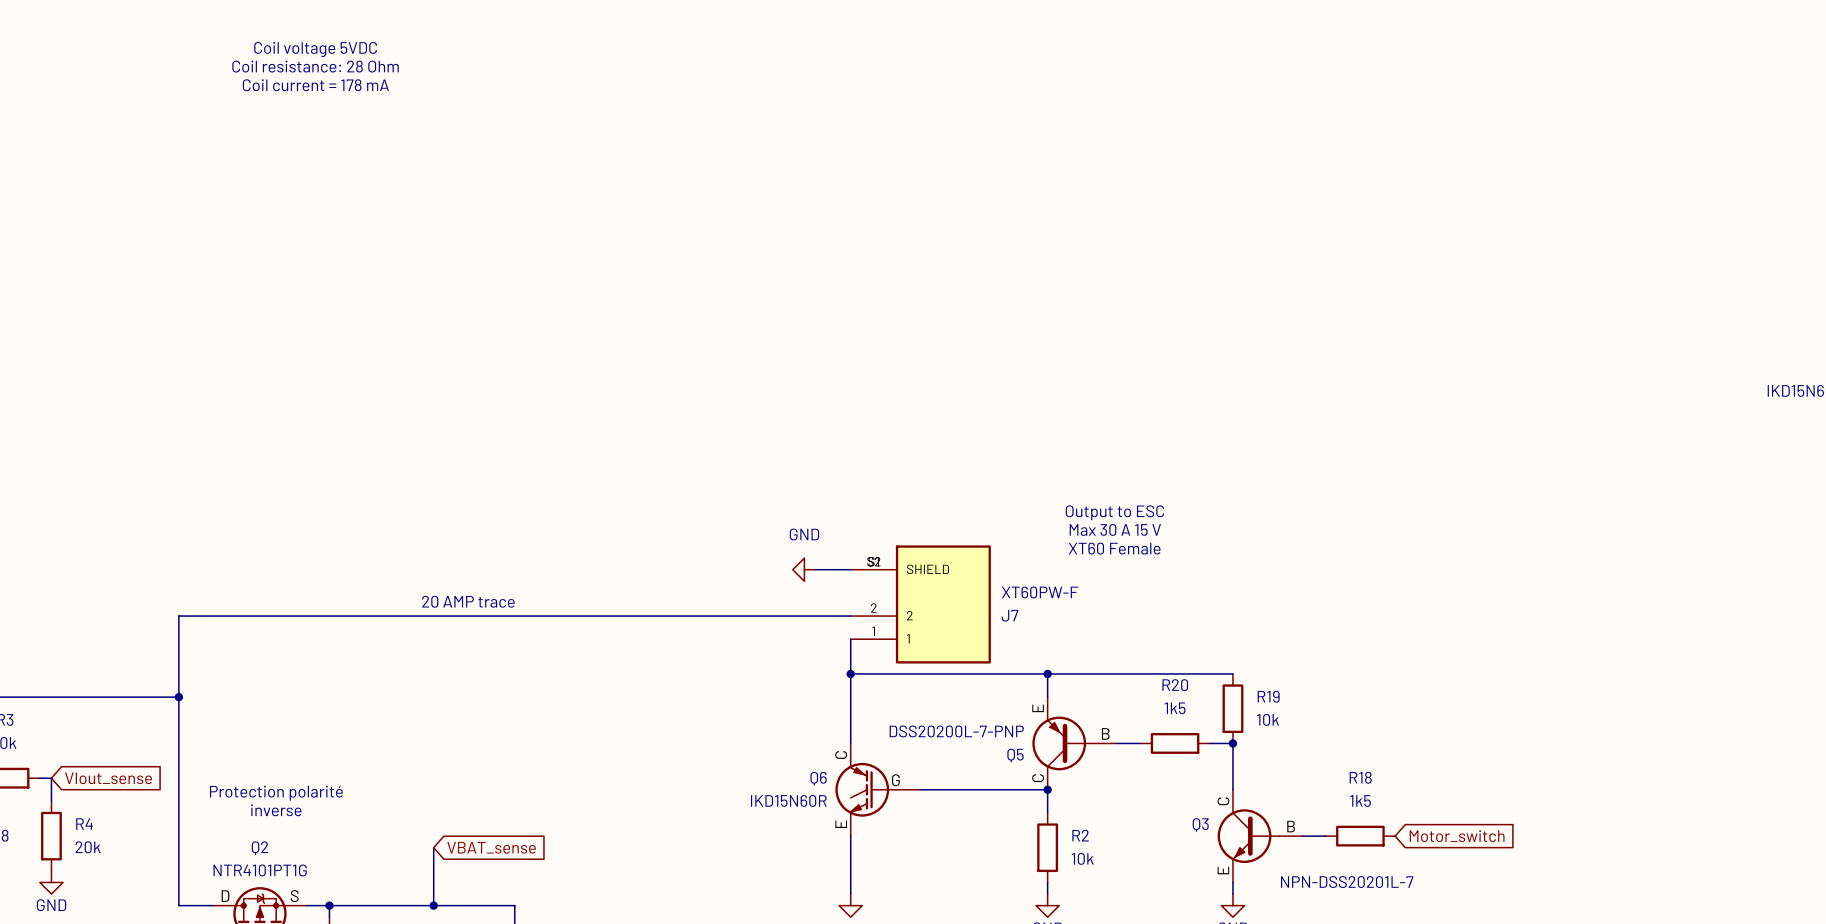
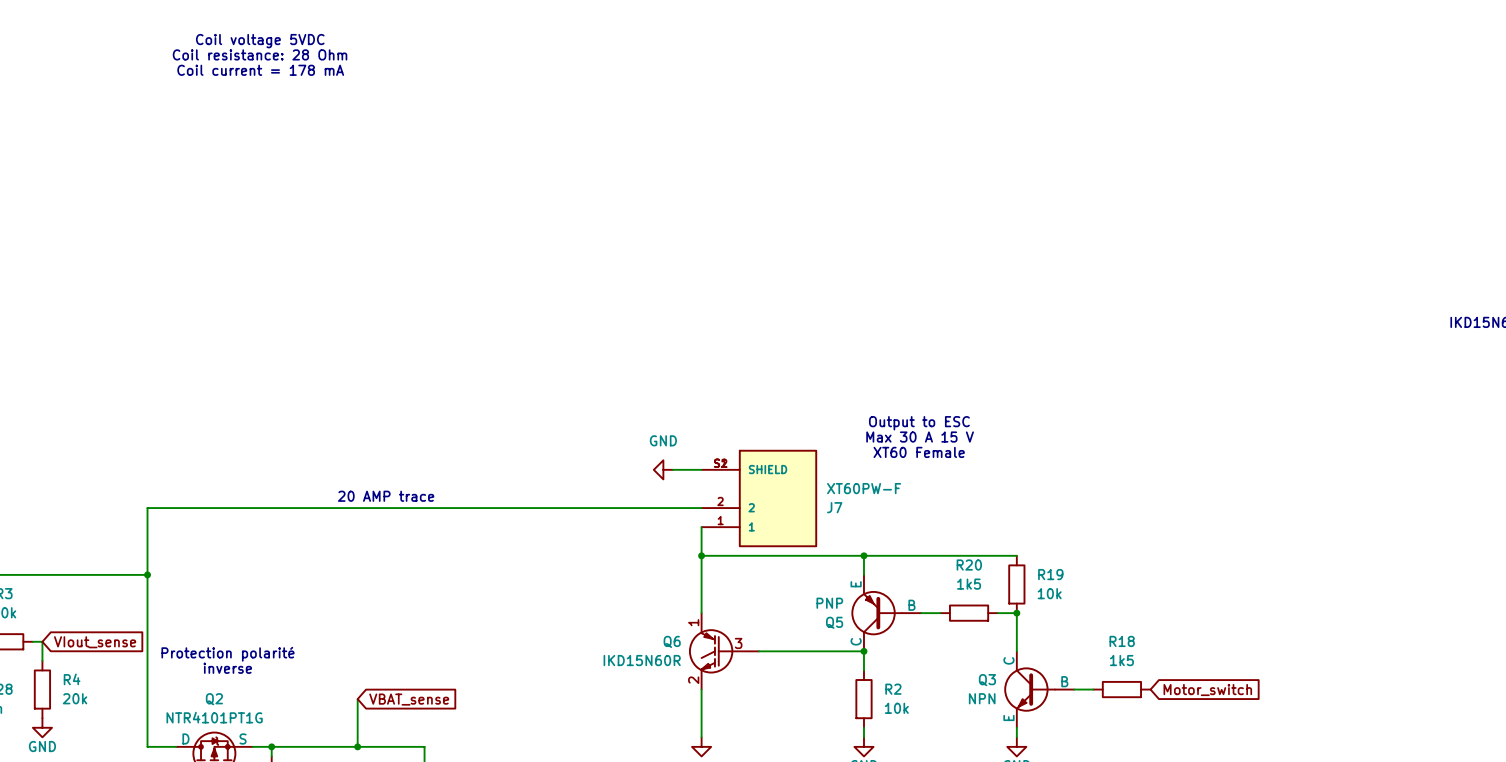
Q5 value: DSS20200L-7-PNP (956, 731) -> PNP (829, 603)
Q6 pin number: C (841, 754) -> 1 (693, 622)
Q6 pin number: G (895, 780) -> 3 (738, 643)
Q6 pin number: E (841, 824) -> 2 (693, 680)
Q3 value: NPN-DSS20201L-7 (1347, 882) -> NPN (982, 698)

